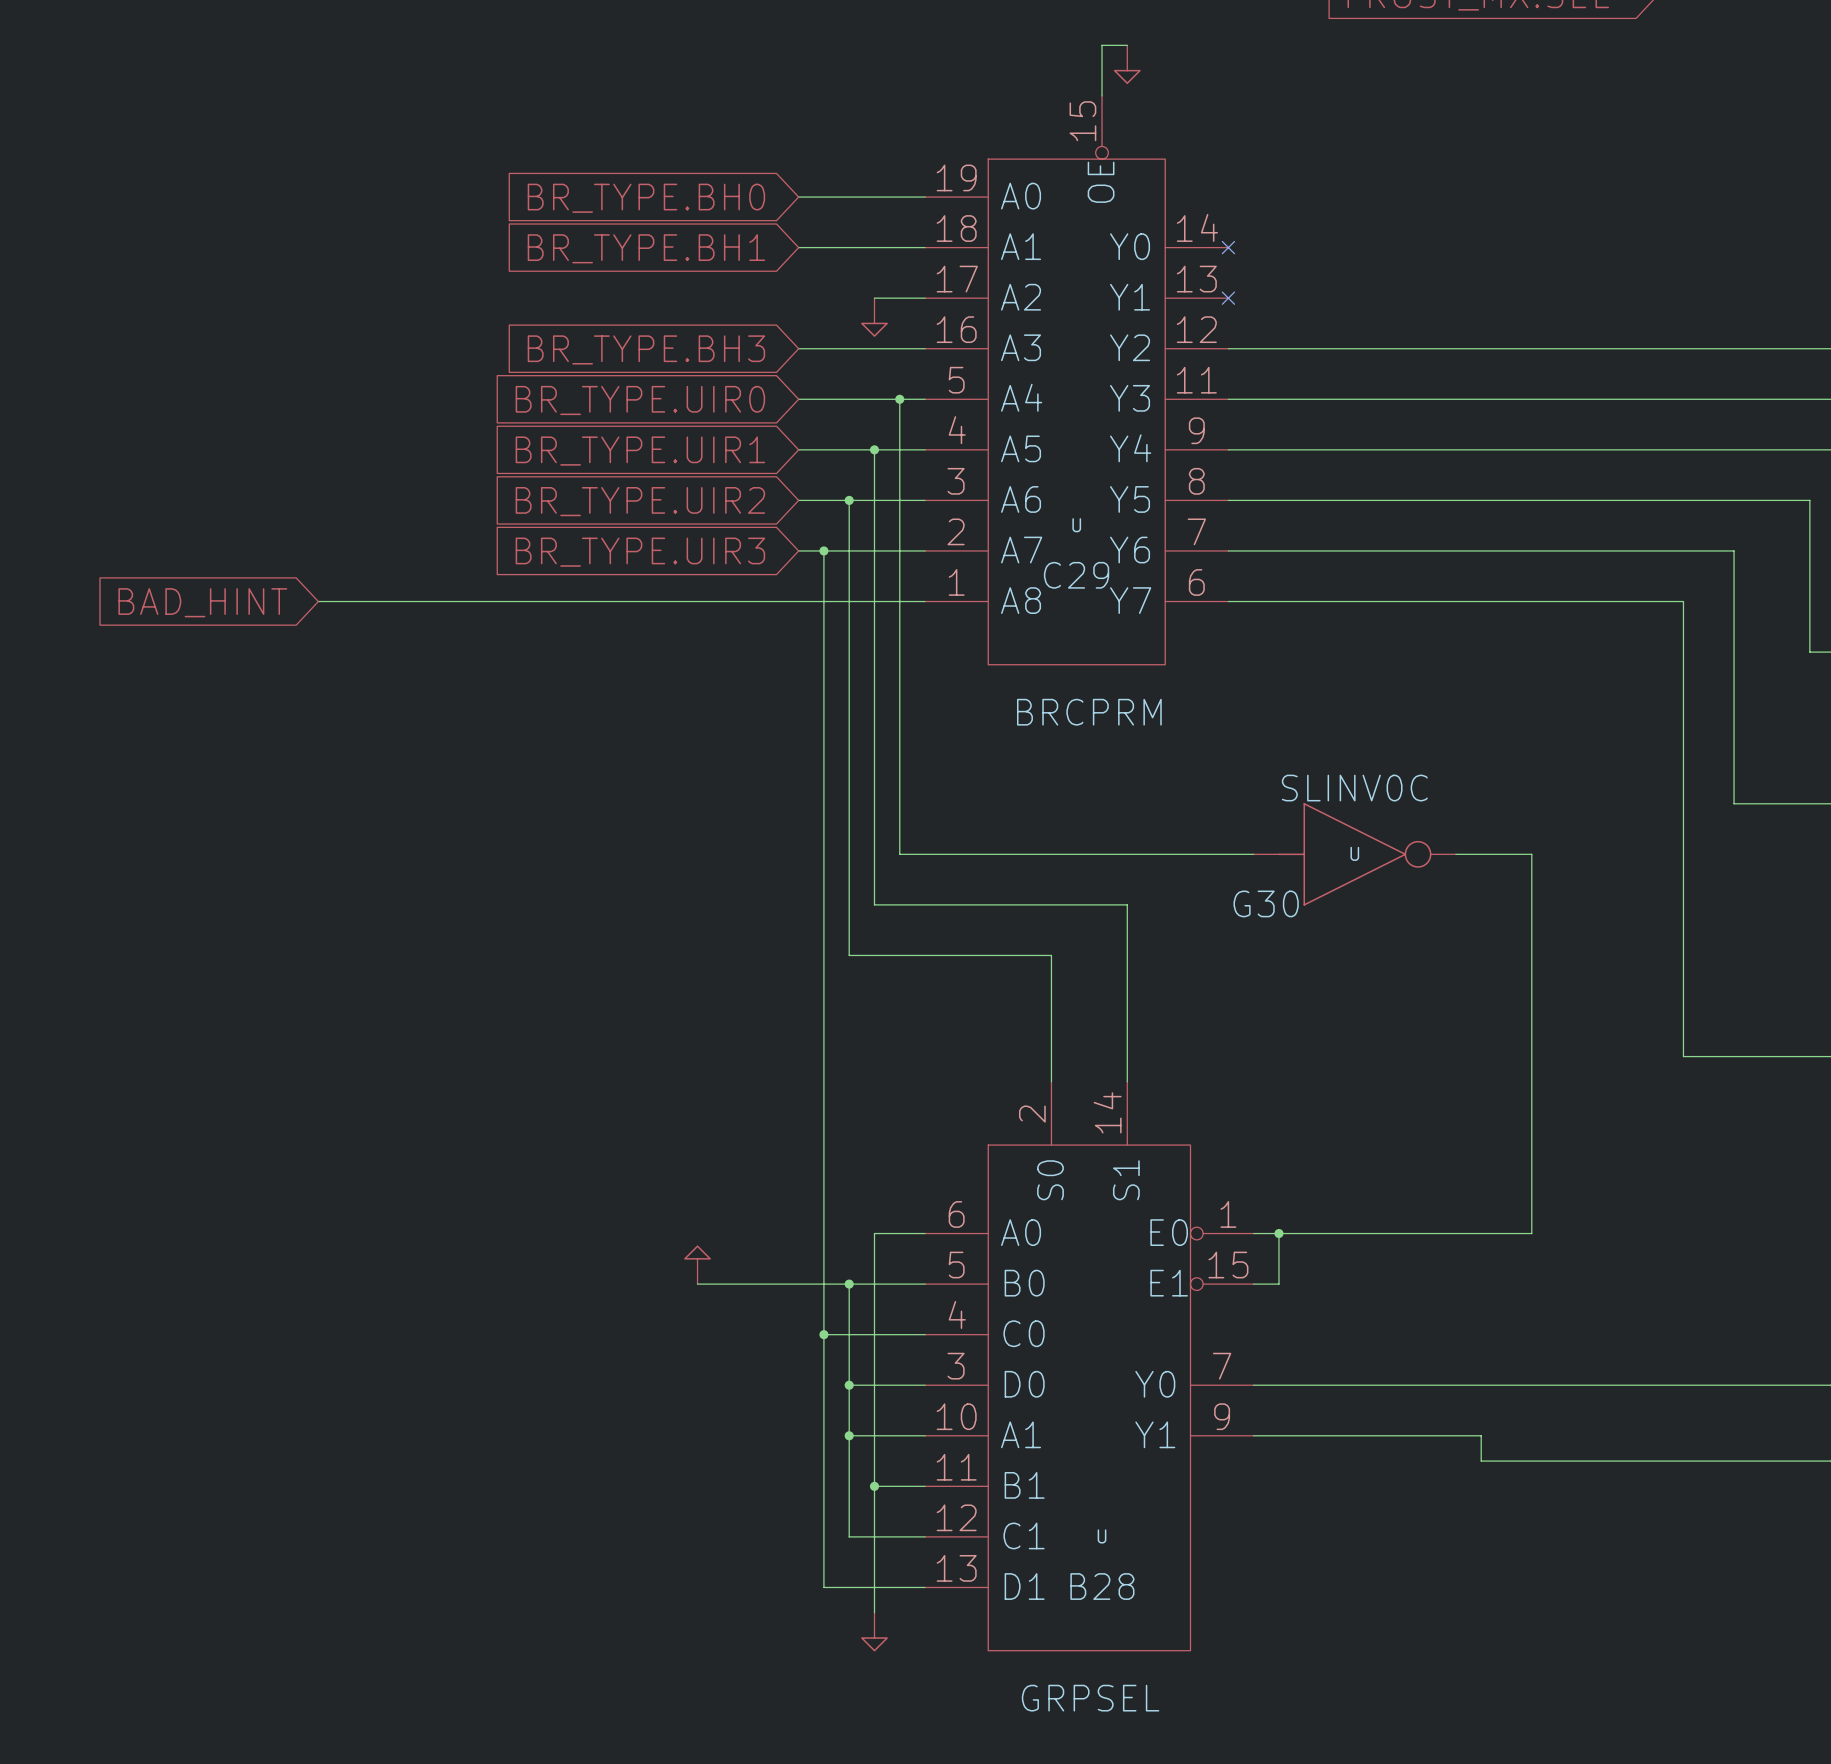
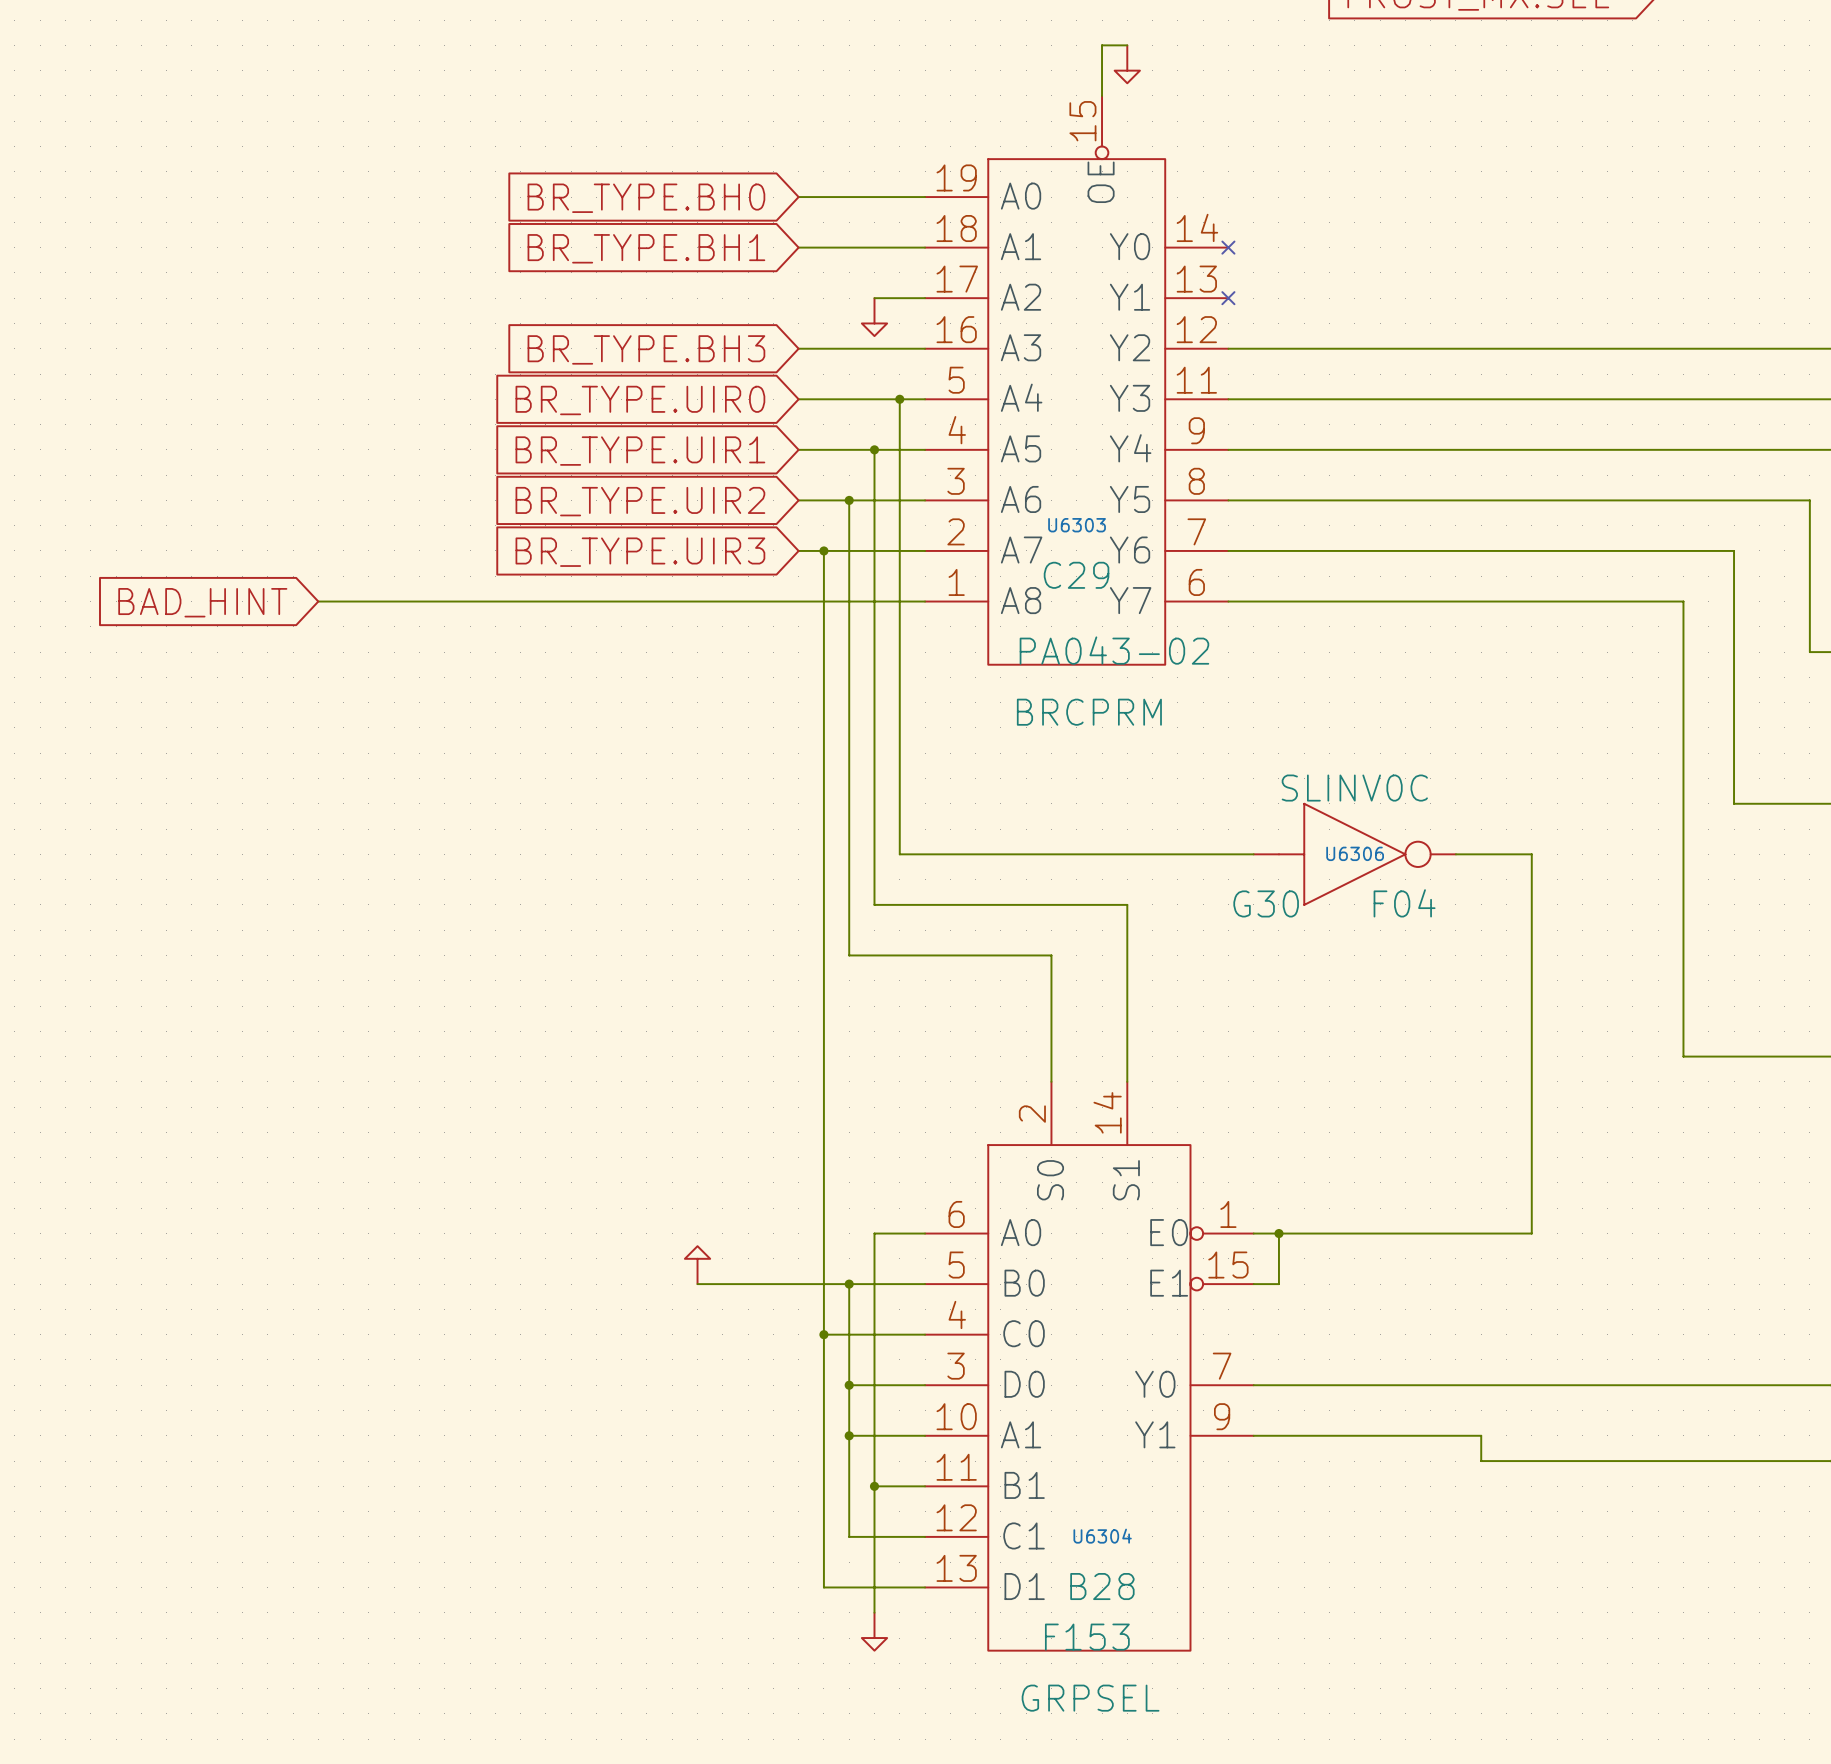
U name: U (1076, 525) -> U6303 (1077, 525)
U value: none -> PA043-02 (1114, 650)
U name: U (1354, 853) -> U6306 (1355, 853)
U value: none -> F04 (1404, 903)
U name: U (1102, 1536) -> U6304 (1102, 1536)
U value: none -> F153 (1087, 1637)

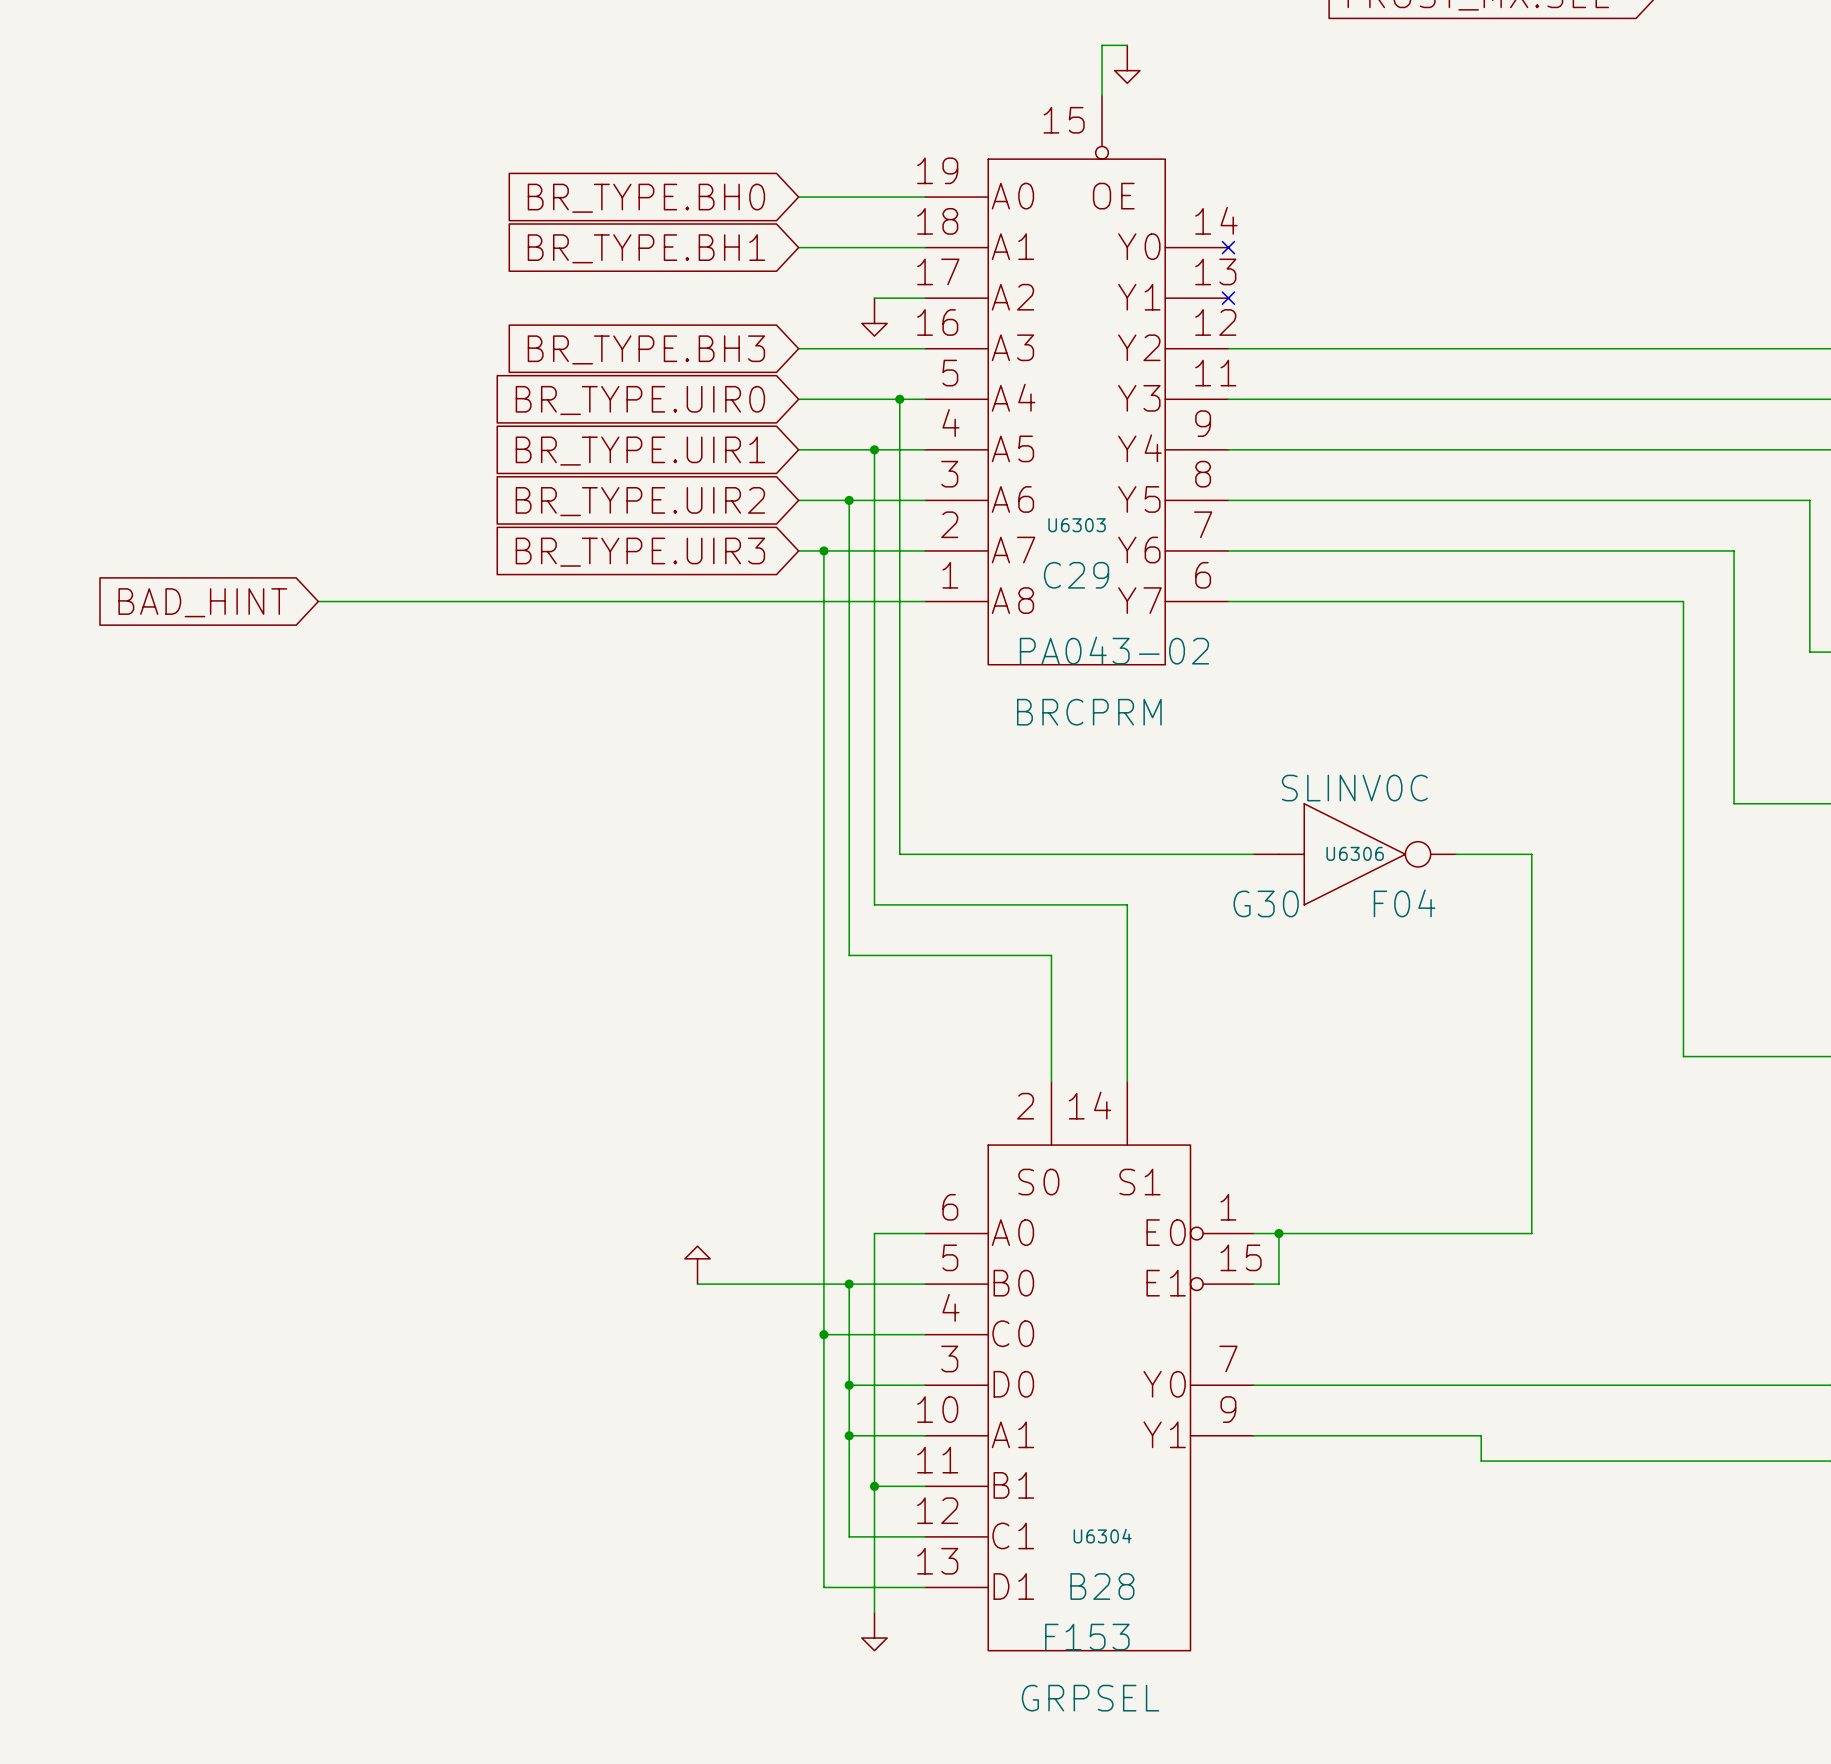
U6303 symbol: [925, 95, 1229, 665] -> [925, 95, 1229, 665]
U6304 symbol: [925, 1081, 1254, 1651] -> [925, 1081, 1254, 1651]

